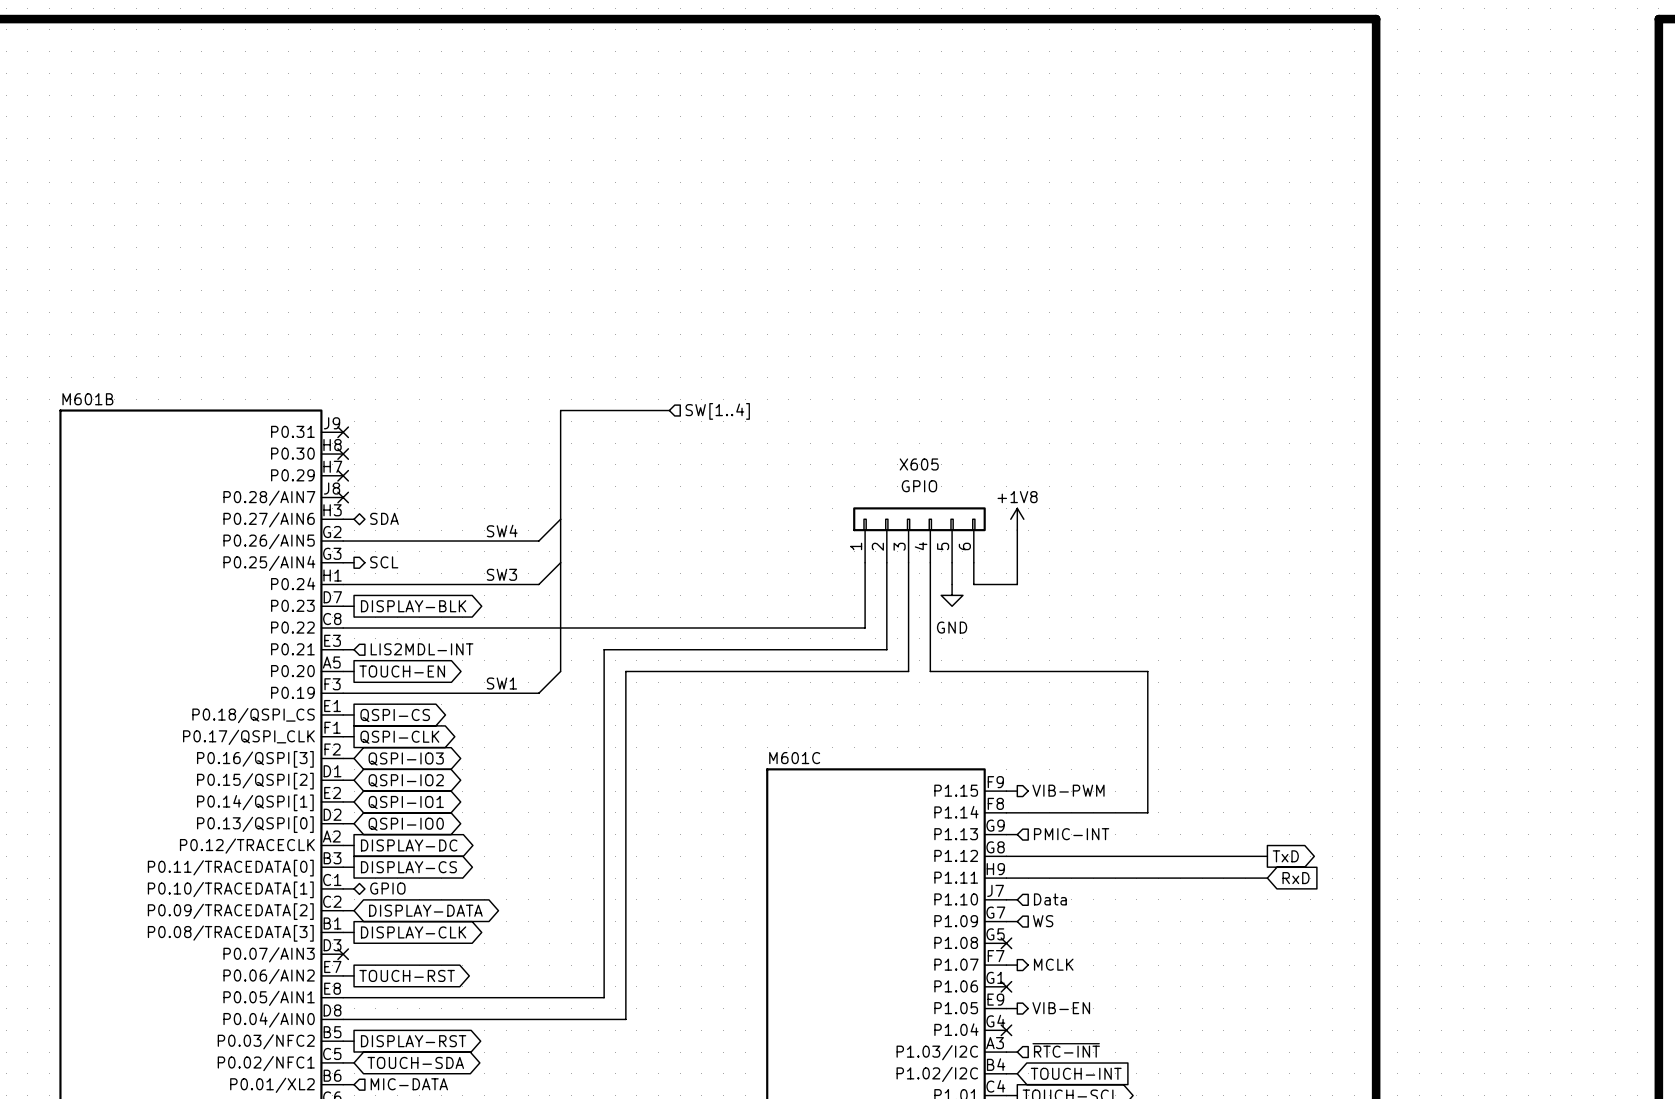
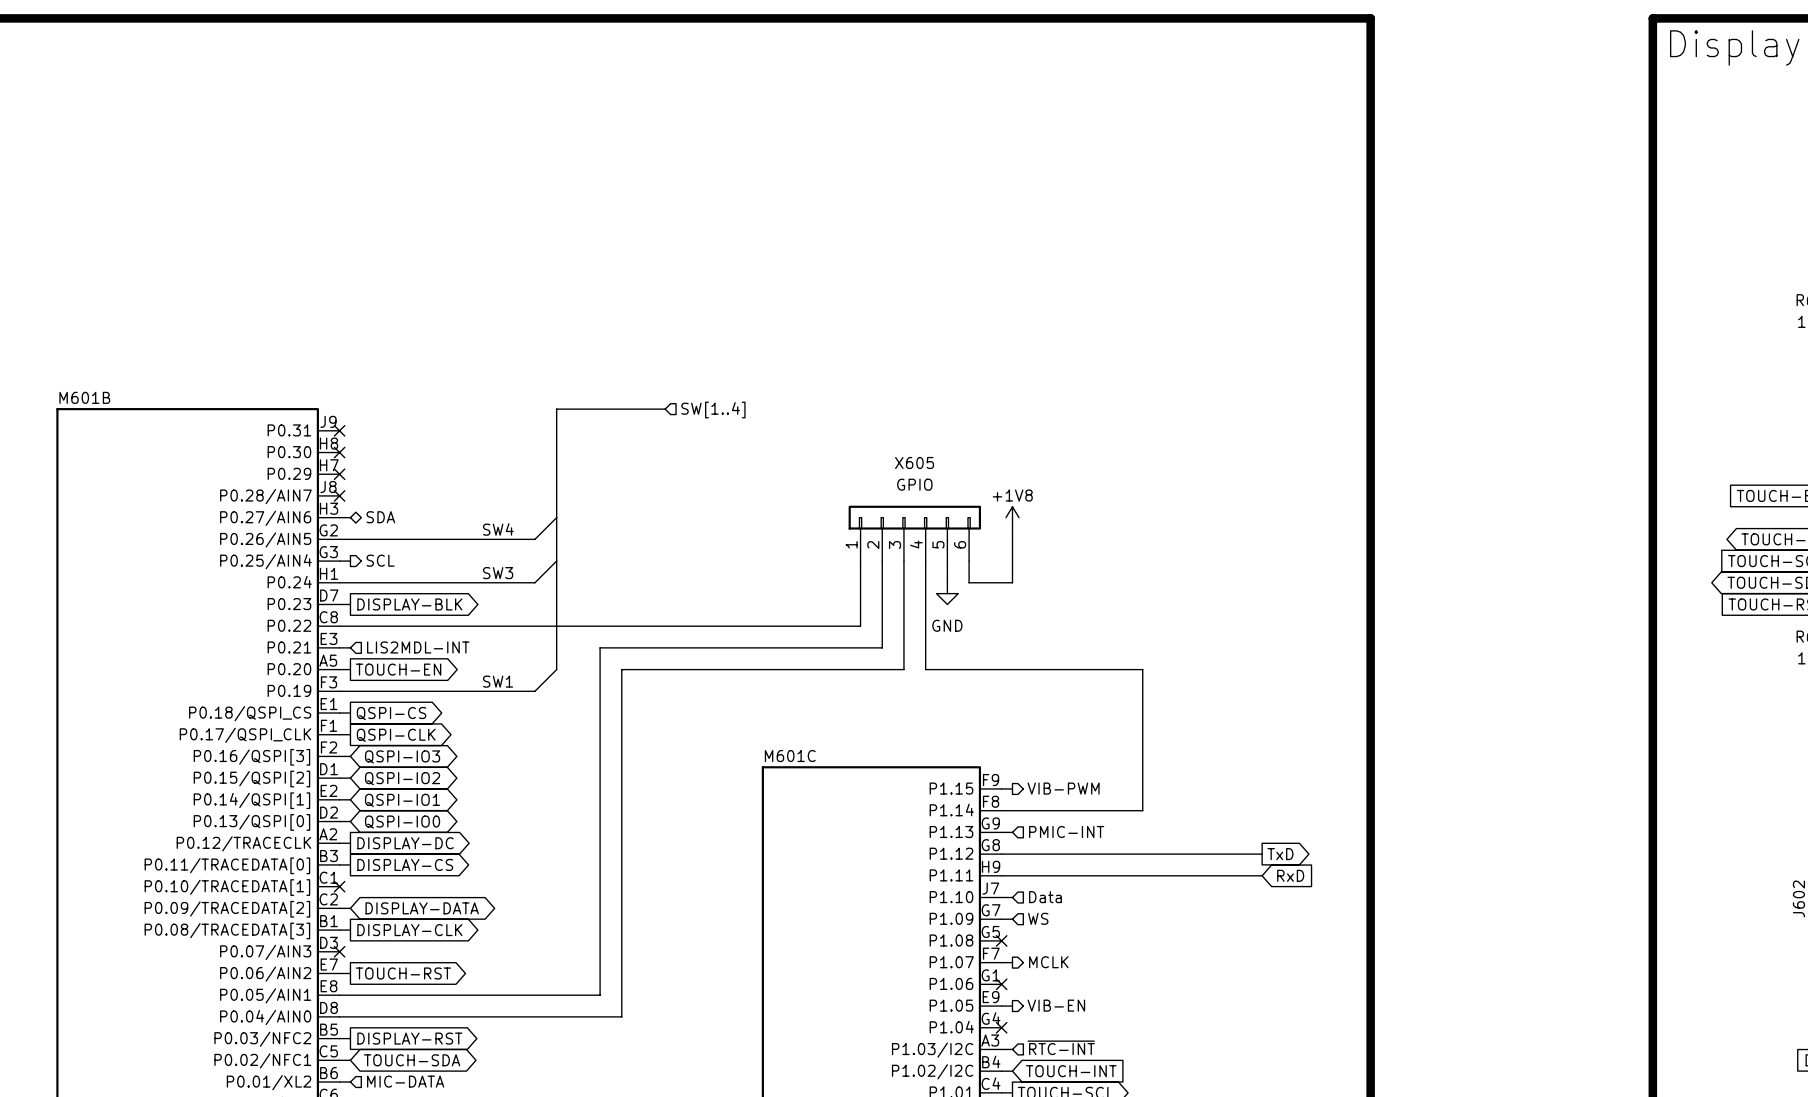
wire: (343, 888) (354, 888) -> none
no-connect mark: none -> (339, 886)
hierarchical label: GPIO (387, 888) -> none

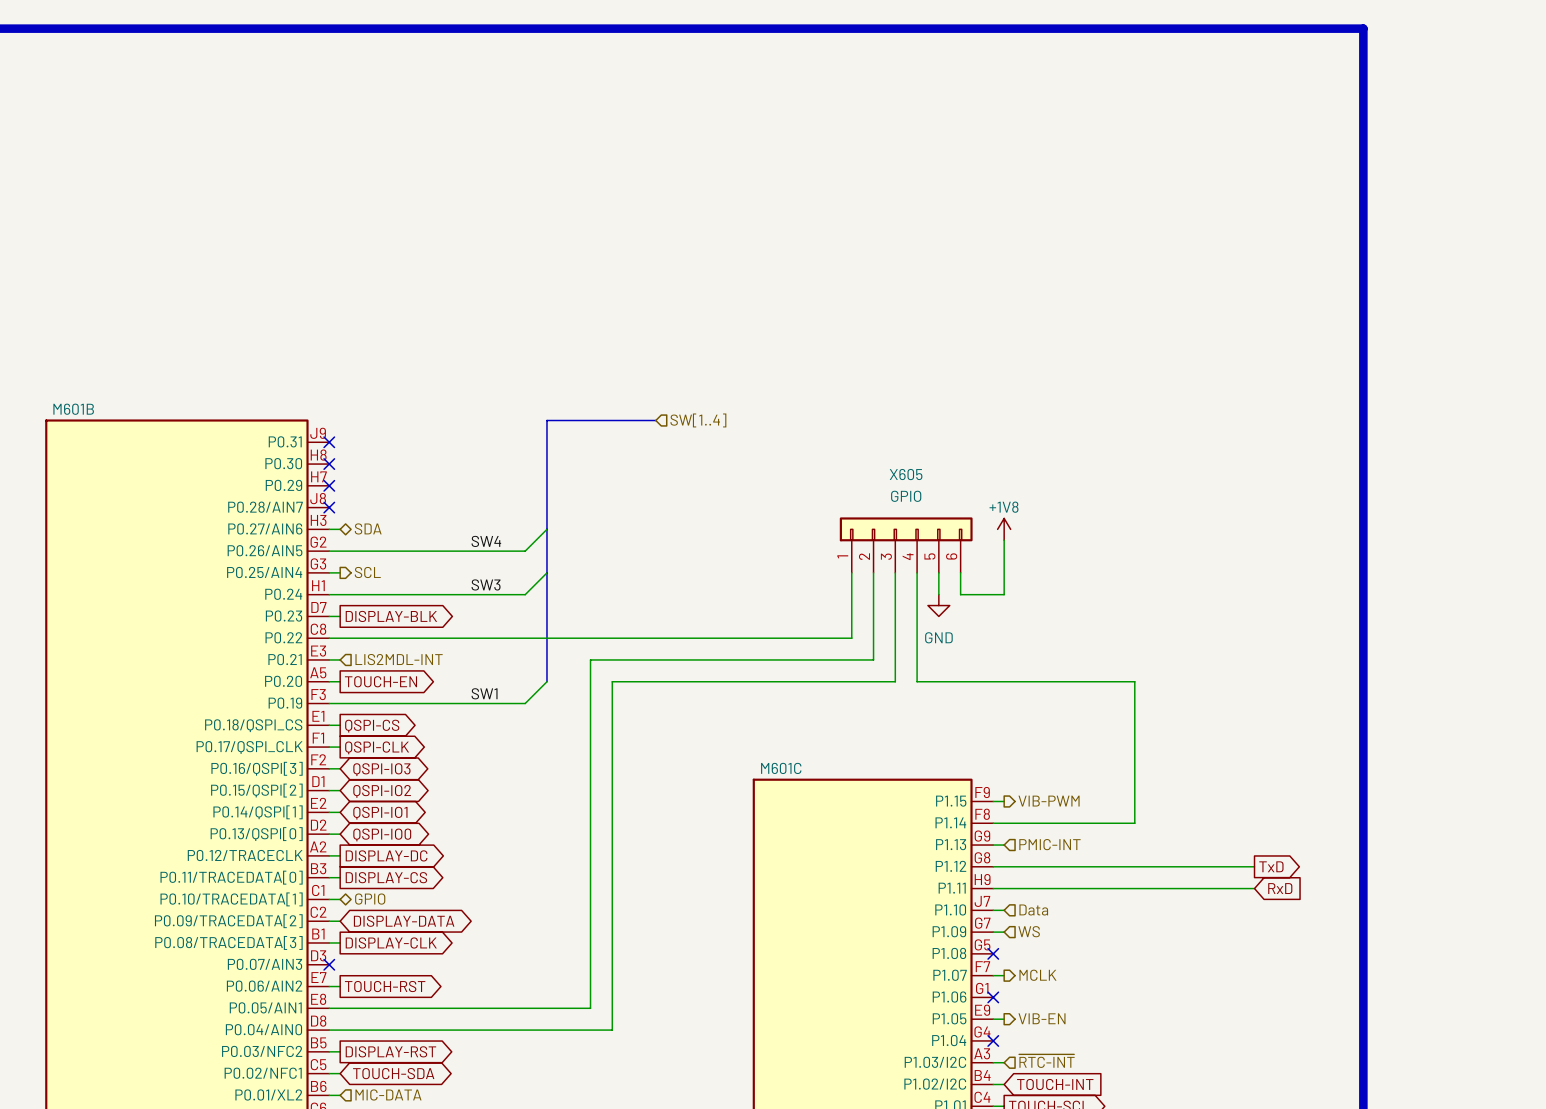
wire: none -> (329, 899) (340, 899)
no-connect mark: (339, 886) -> none
hierarchical label: none -> GPIO (370, 899)

